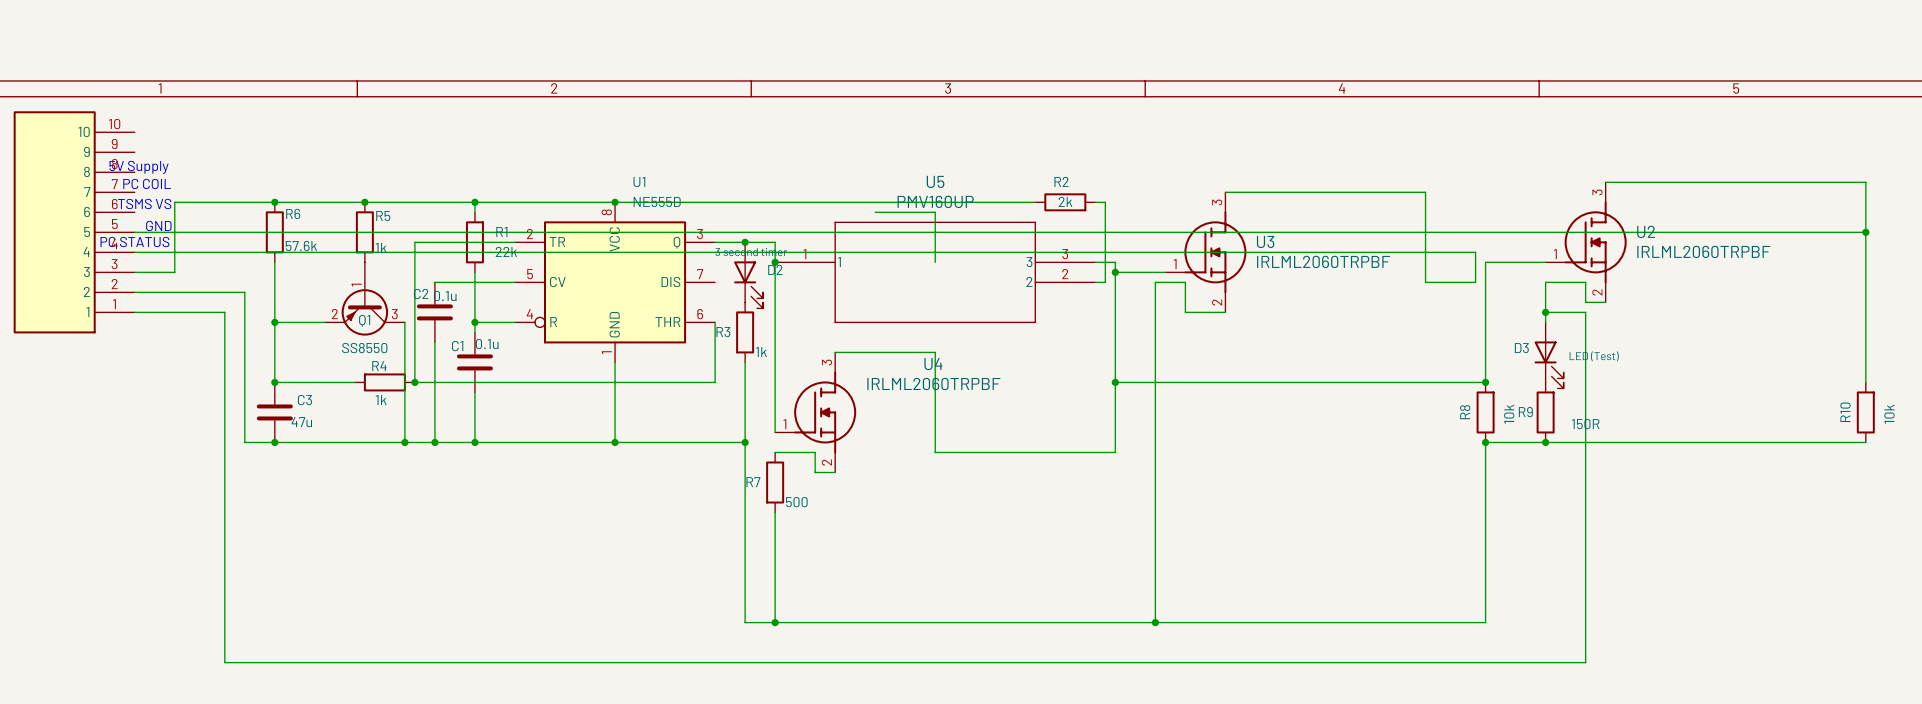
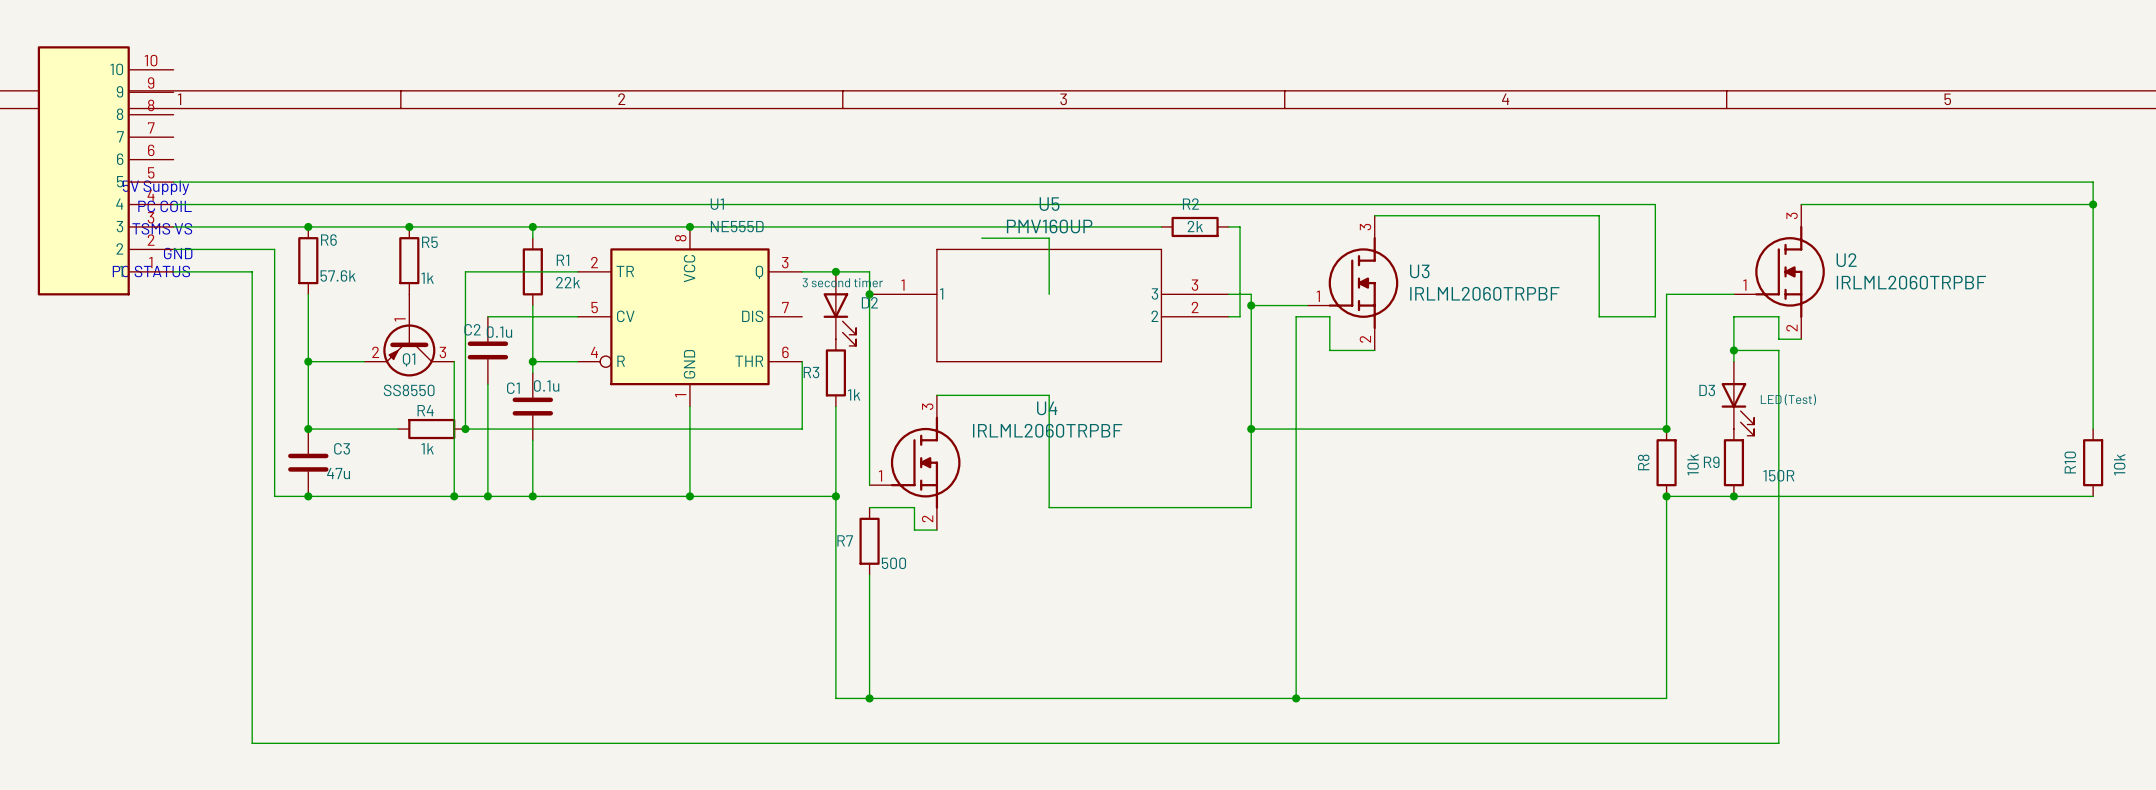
wire: none -> (173, 182) (2093, 182) (2093, 204)
junction: none -> (2093, 204)
wire: (174, 202) (174, 272) (134, 272) -> (196, 226) (173, 226)
part position: (74, 222) -> (105, 170)
wire: (134, 232) (1865, 232) -> none
junction: (1865, 232) -> none
wire: (134, 252) (1475, 252) -> (173, 204) (1655, 204) (1655, 283)
wire: (134, 292) (244, 292) -> (173, 249) (274, 249) (274, 328)
wire: (134, 312) (224, 312) -> (173, 271) (252, 271) (252, 350)

